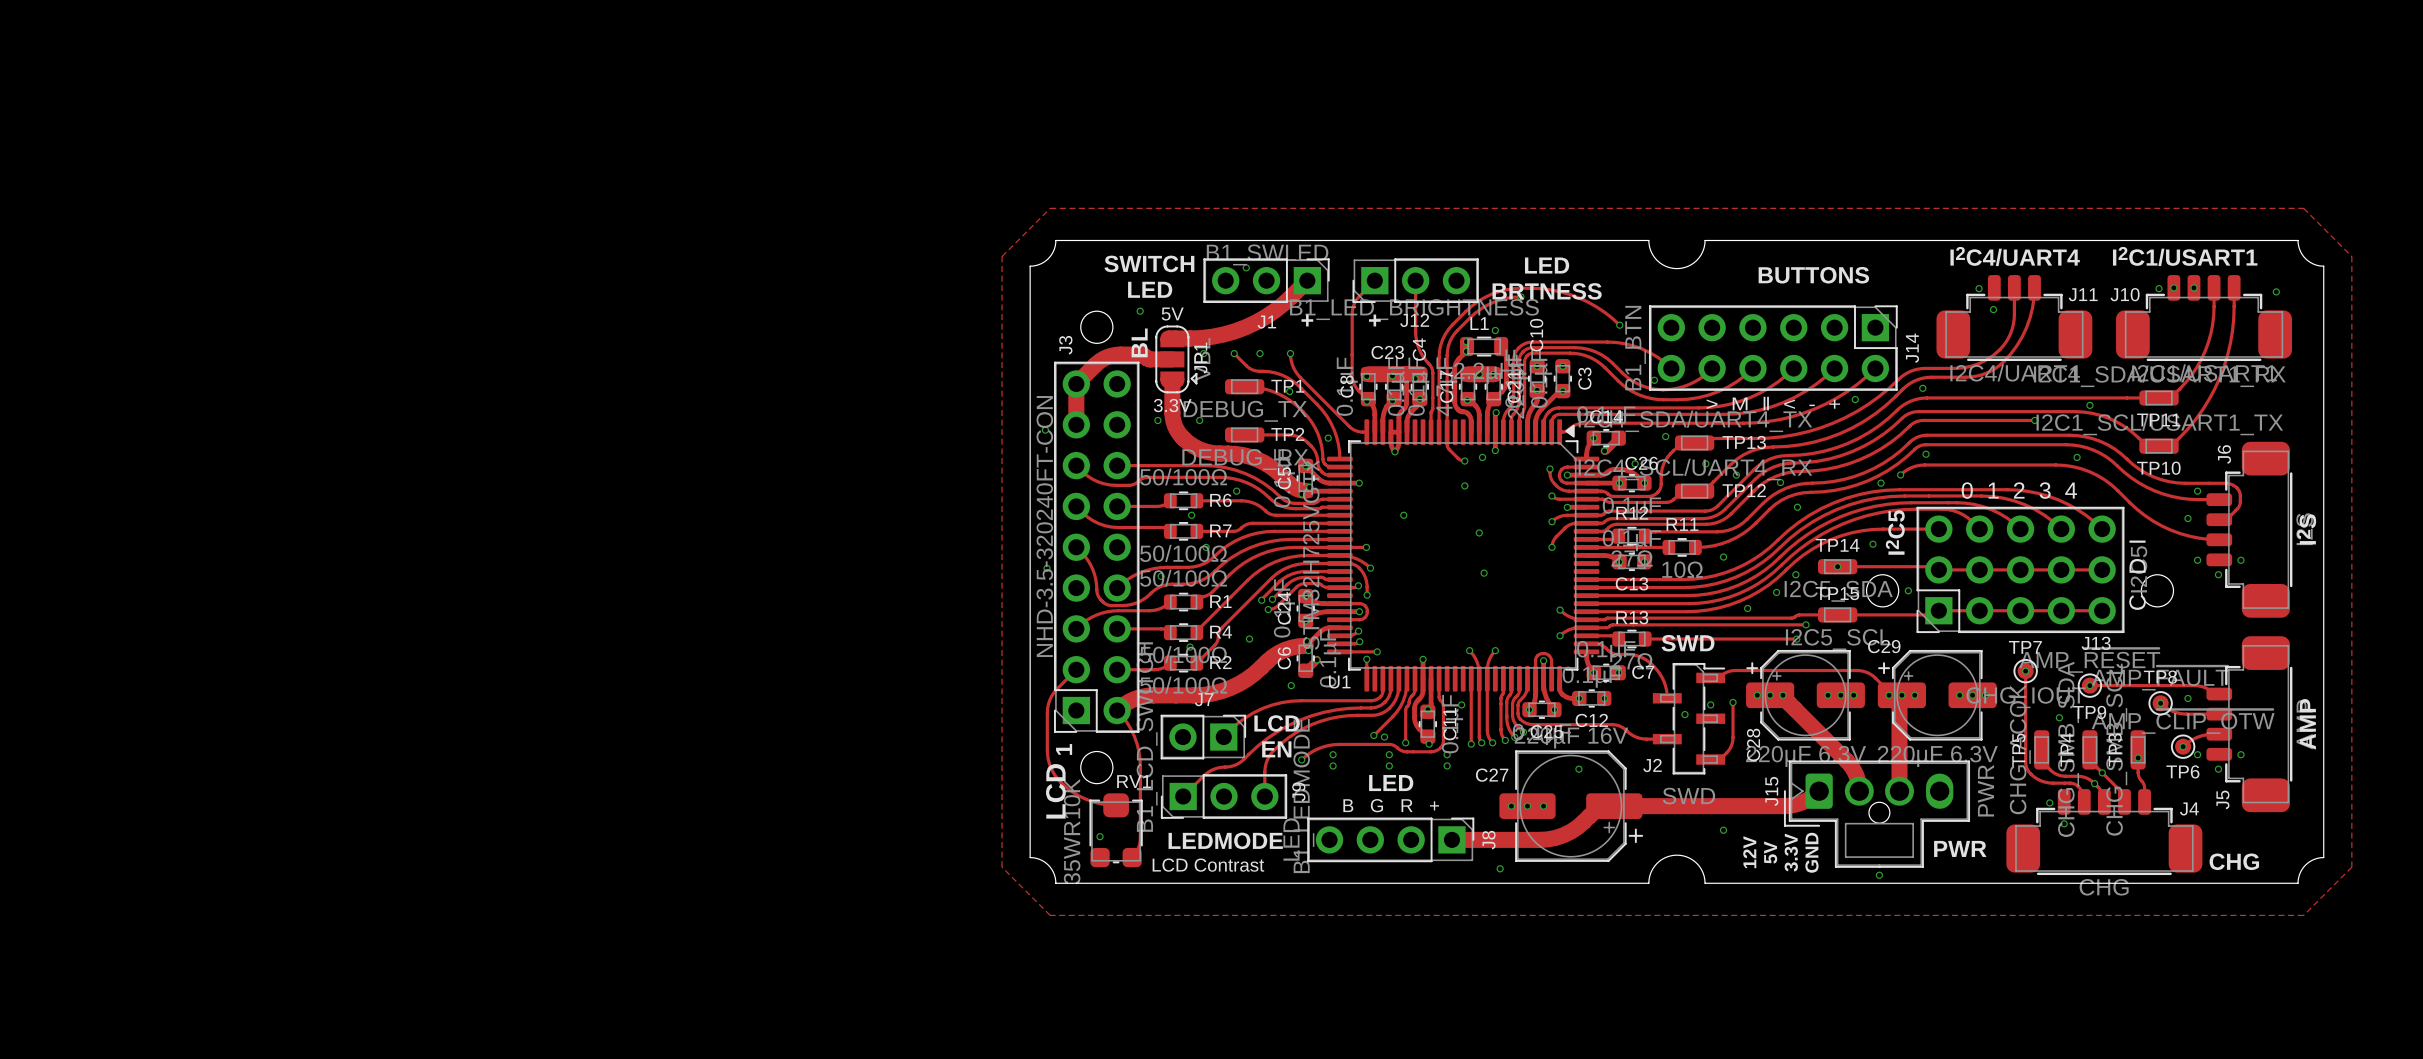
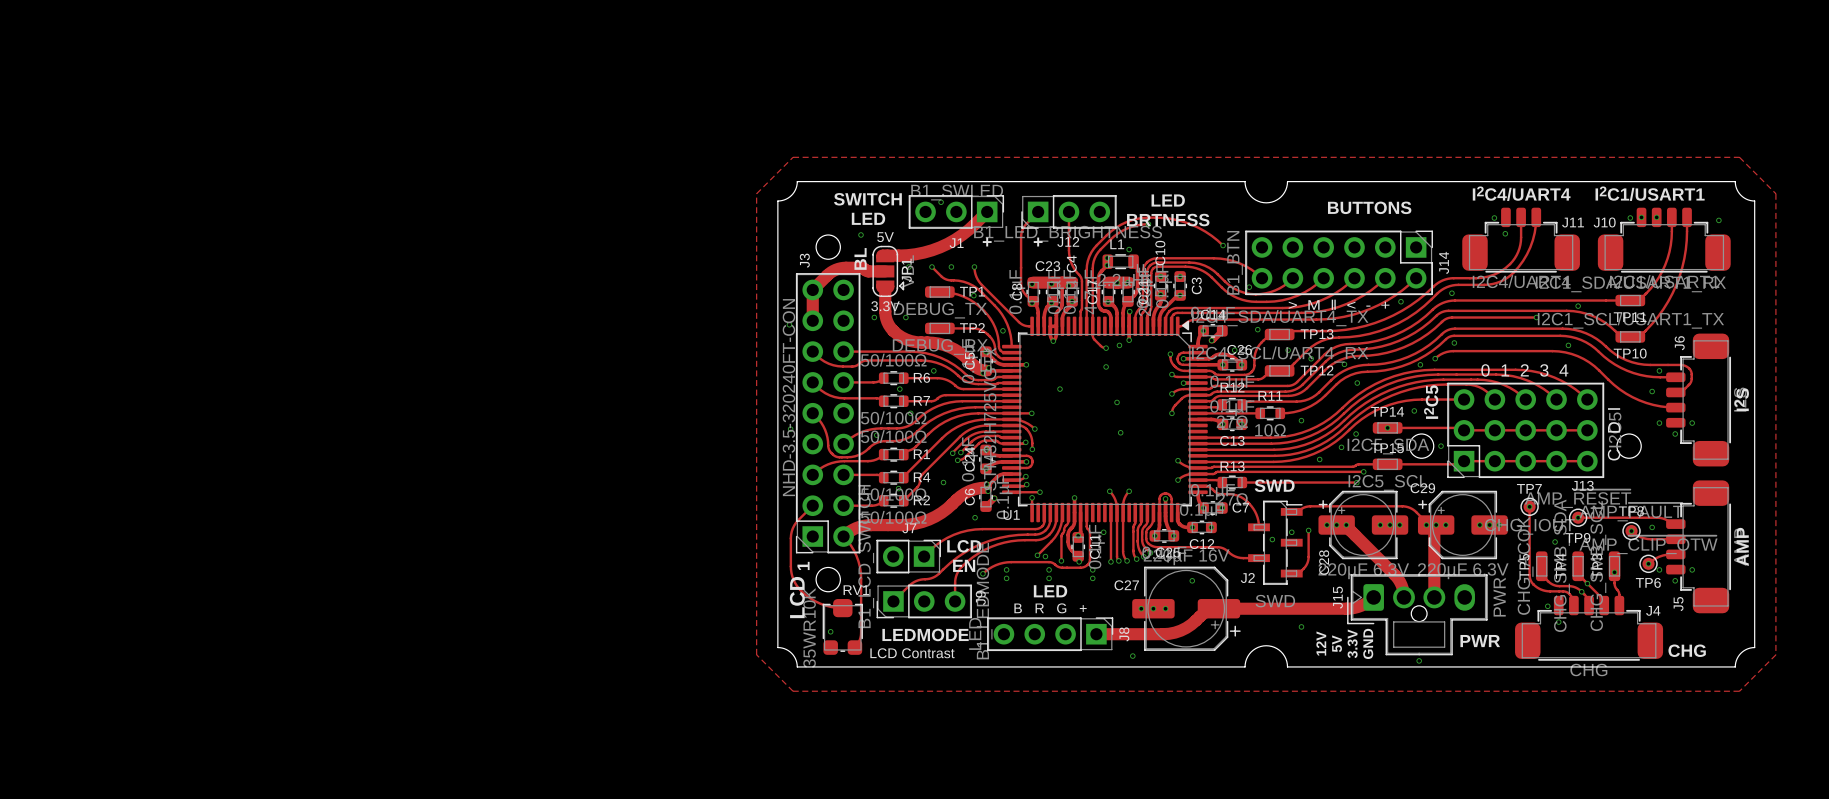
text: B G R + (1391, 805) -> B R G + (1050, 608)

